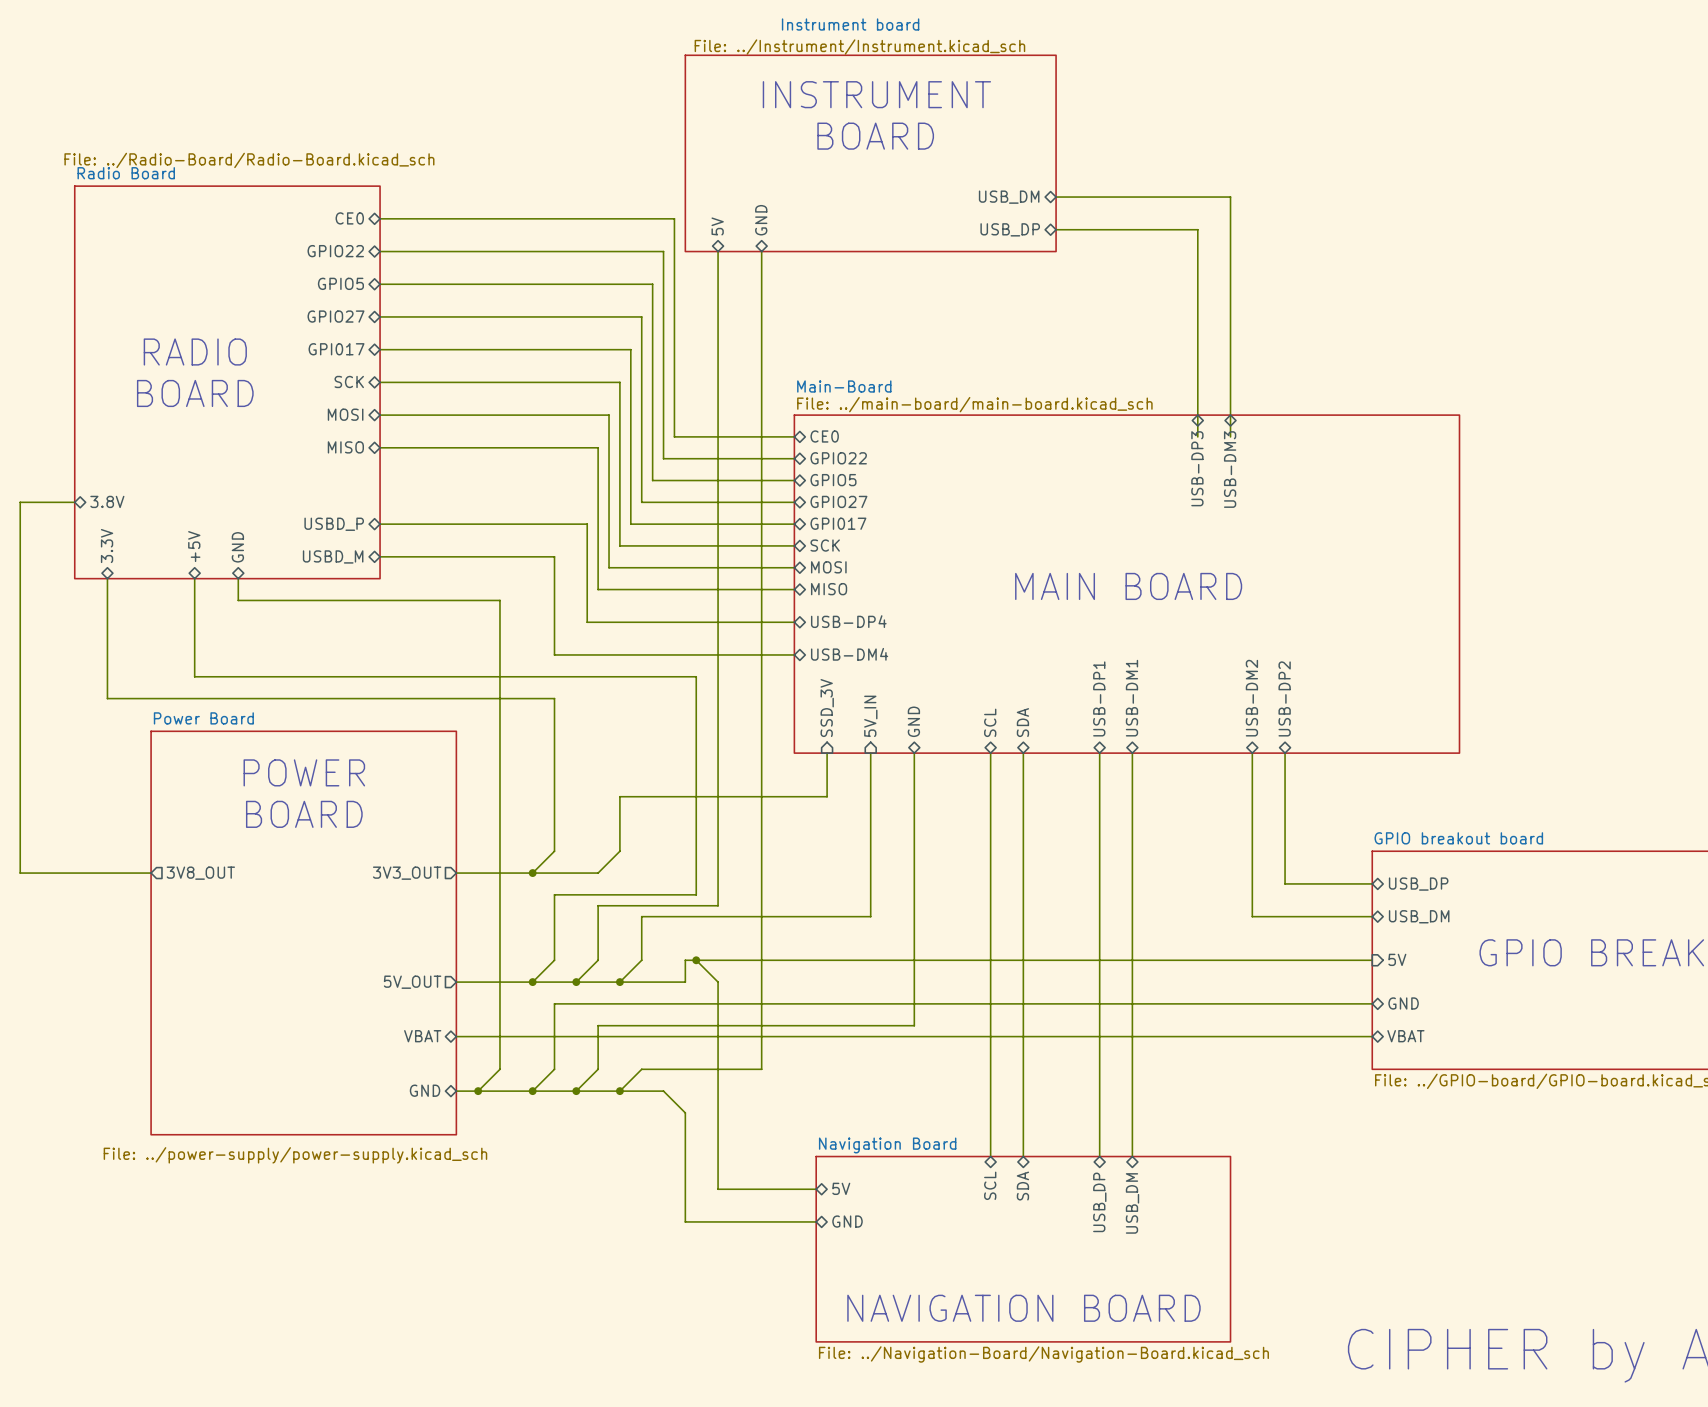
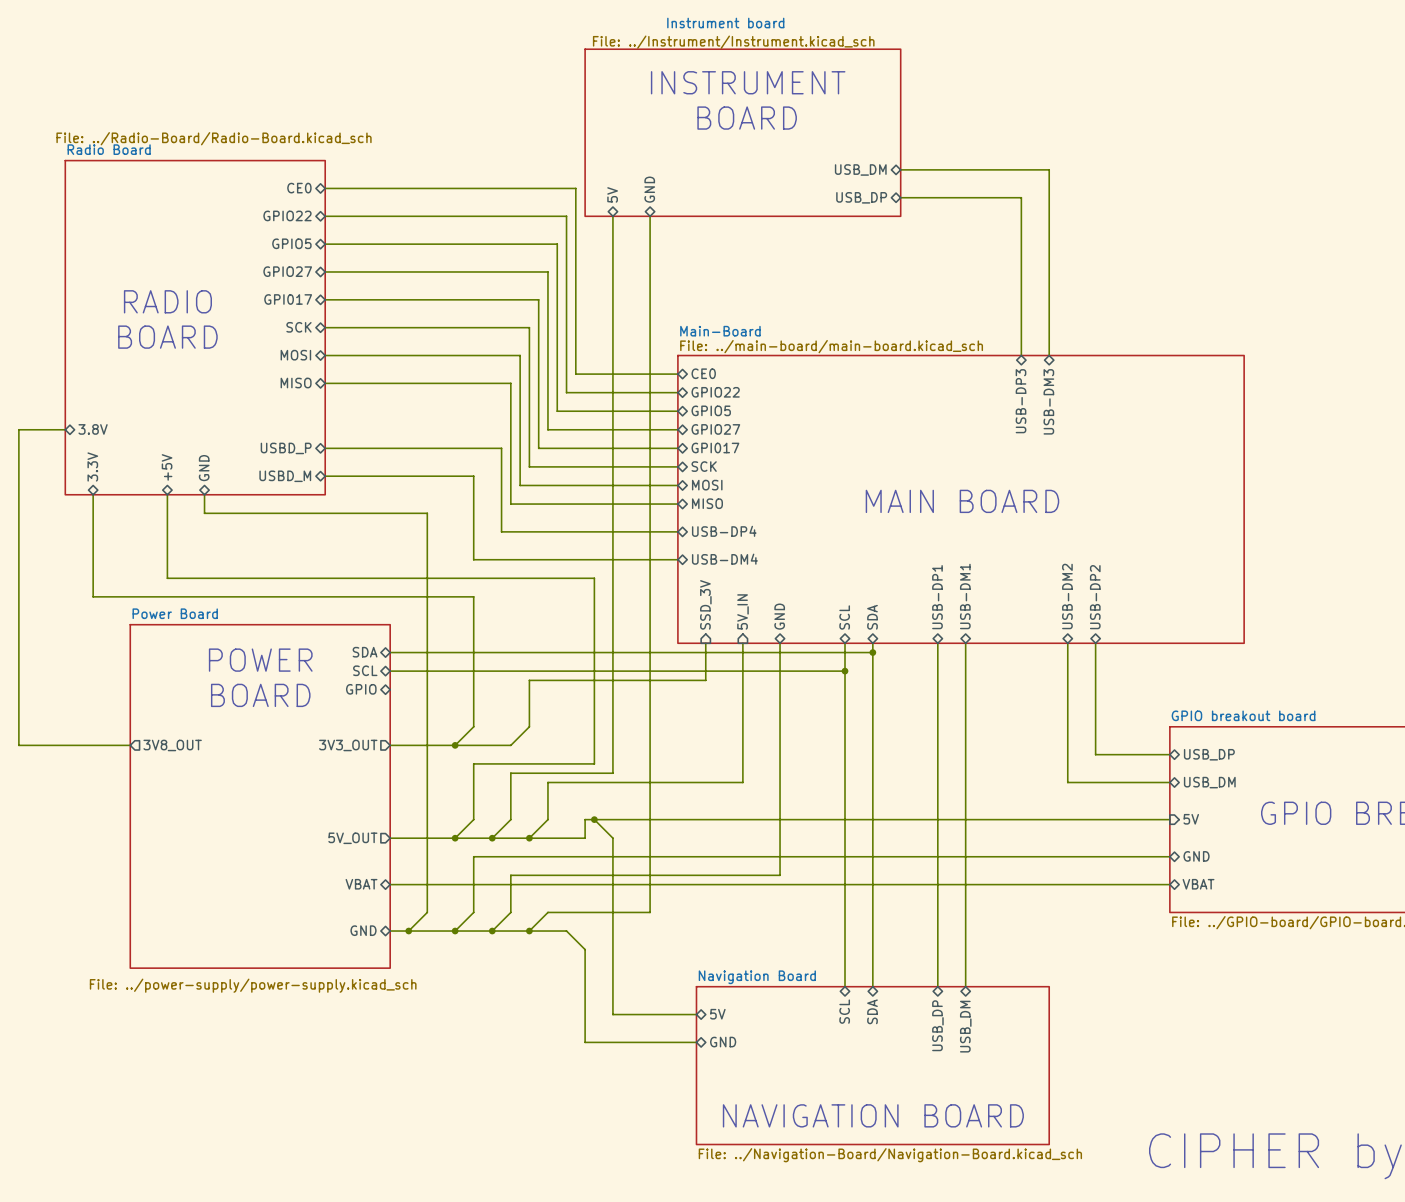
wire: (1197, 415) (1197, 436) -> none
wire: (1230, 415) (1230, 436) -> none
sheet pin: none -> SDA (365, 652)
wire: none -> (390, 652) (872, 652)
junction: none -> (872, 652)
sheet pin: none -> SCL (365, 670)
wire: none -> (390, 671) (845, 671)
junction: none -> (845, 671)
sheet pin: none -> GPIO (361, 689)

